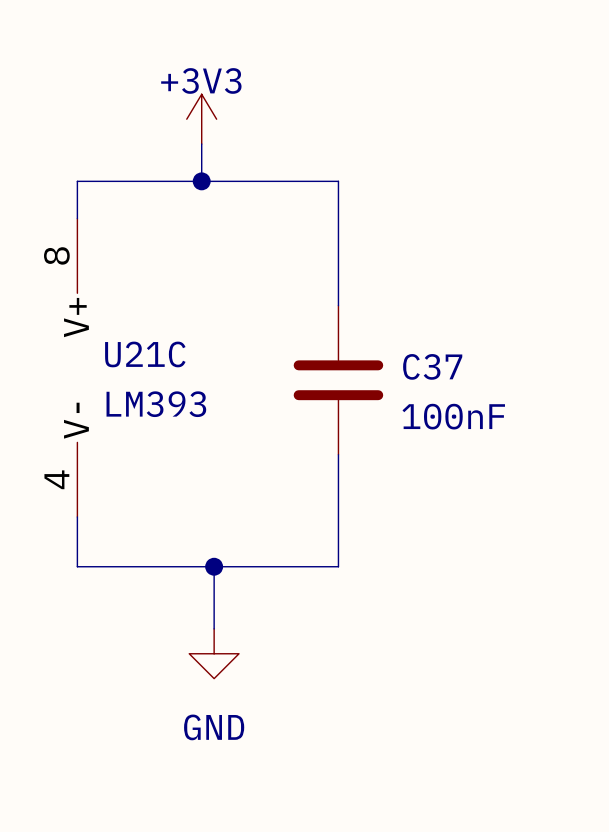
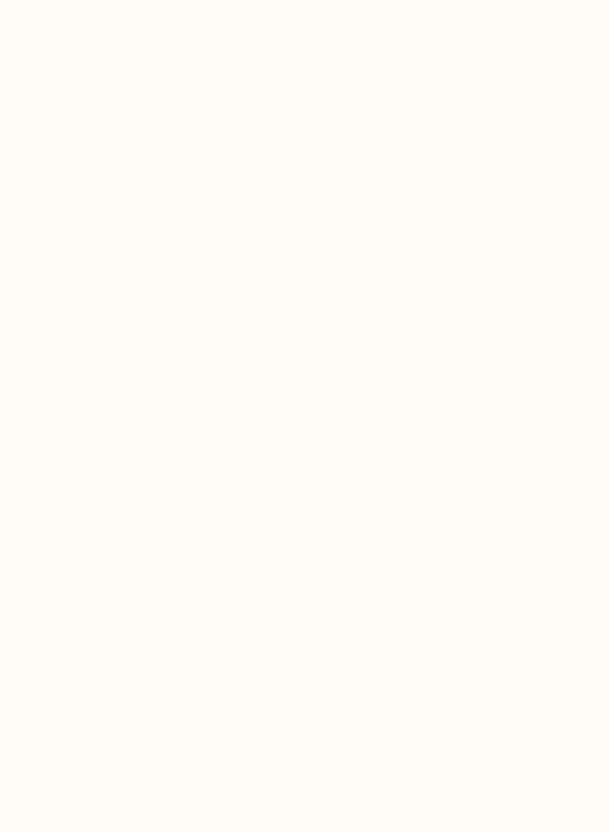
power symbol: +3V3 (201, 119) -> none
wire: (201, 144) (201, 181) -> none
junction: (201, 181) -> none
wire: (77, 218) (77, 181) (338, 181) (338, 305) -> none
U21C: LM393 (77, 367) -> none
C37: 100nF (338, 380) -> none
wire: (338, 454) (338, 566) (77, 566) (77, 517) -> none
wire: (214, 566) (214, 628) -> none
junction: (214, 566) -> none
power symbol: GND (214, 653) -> none

